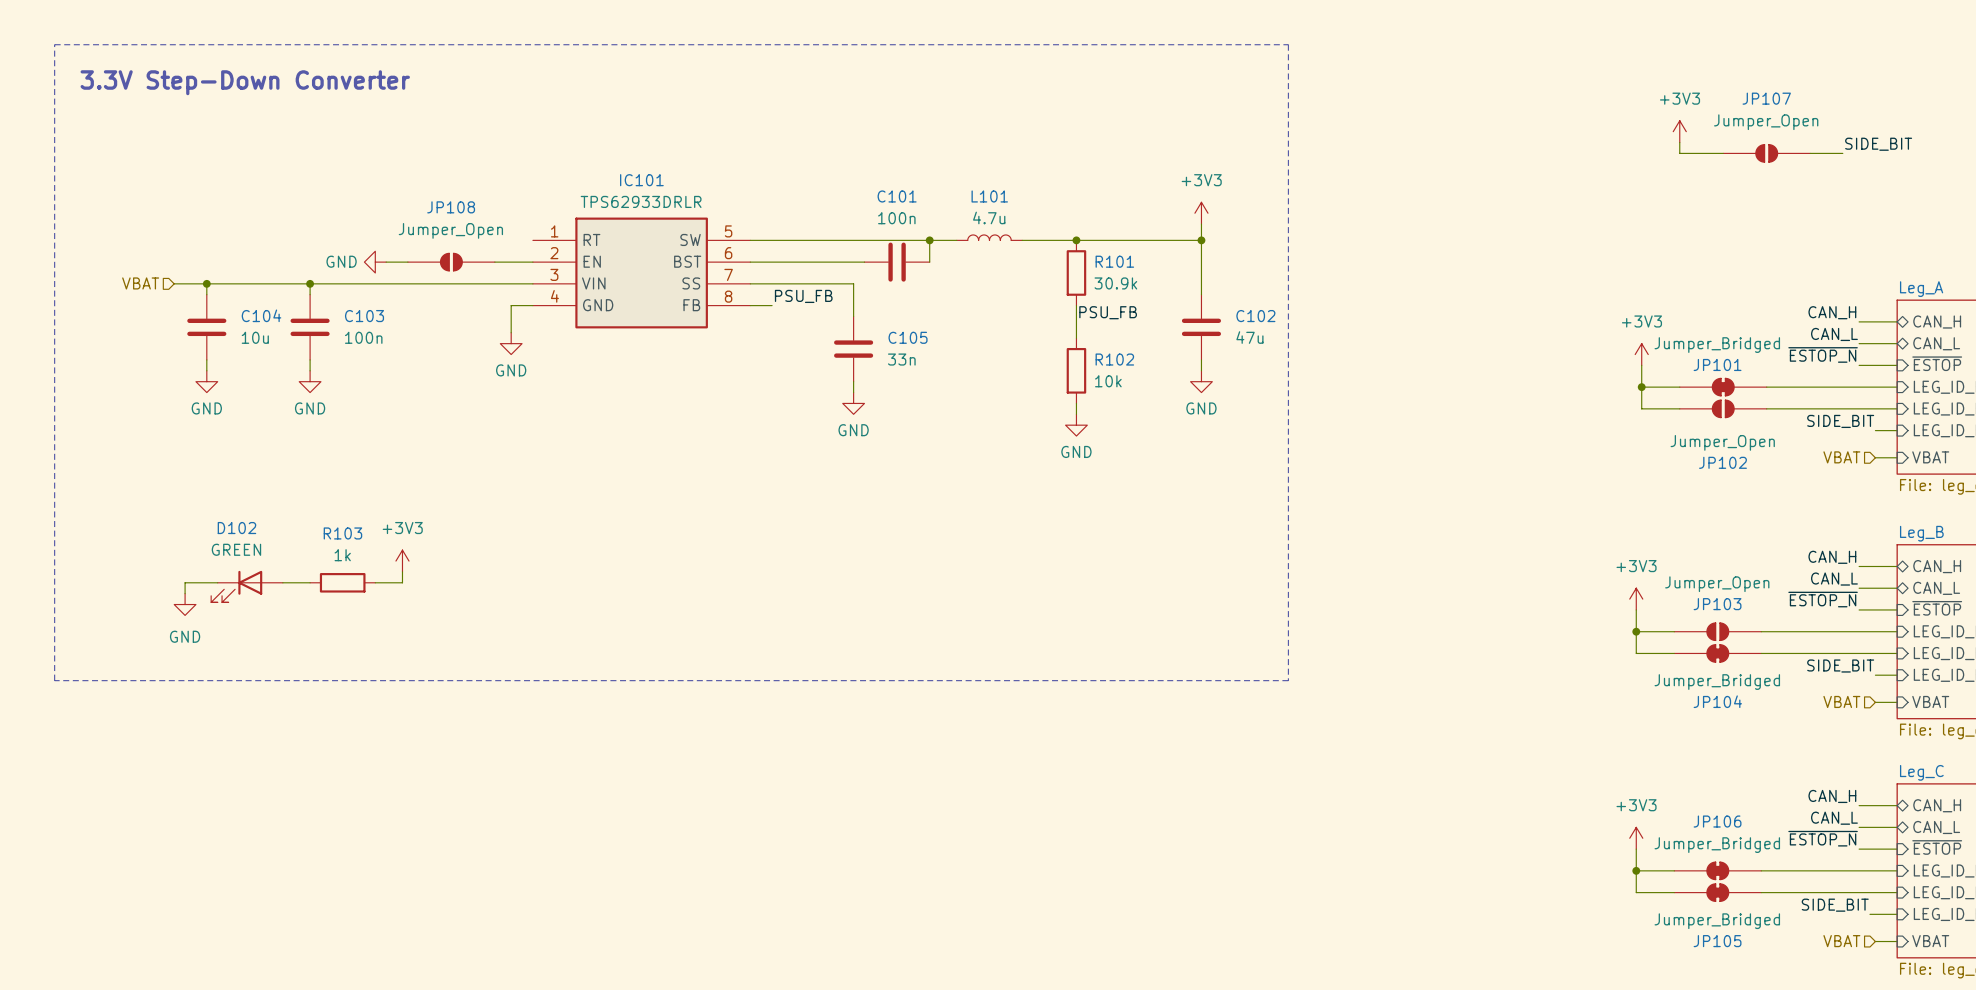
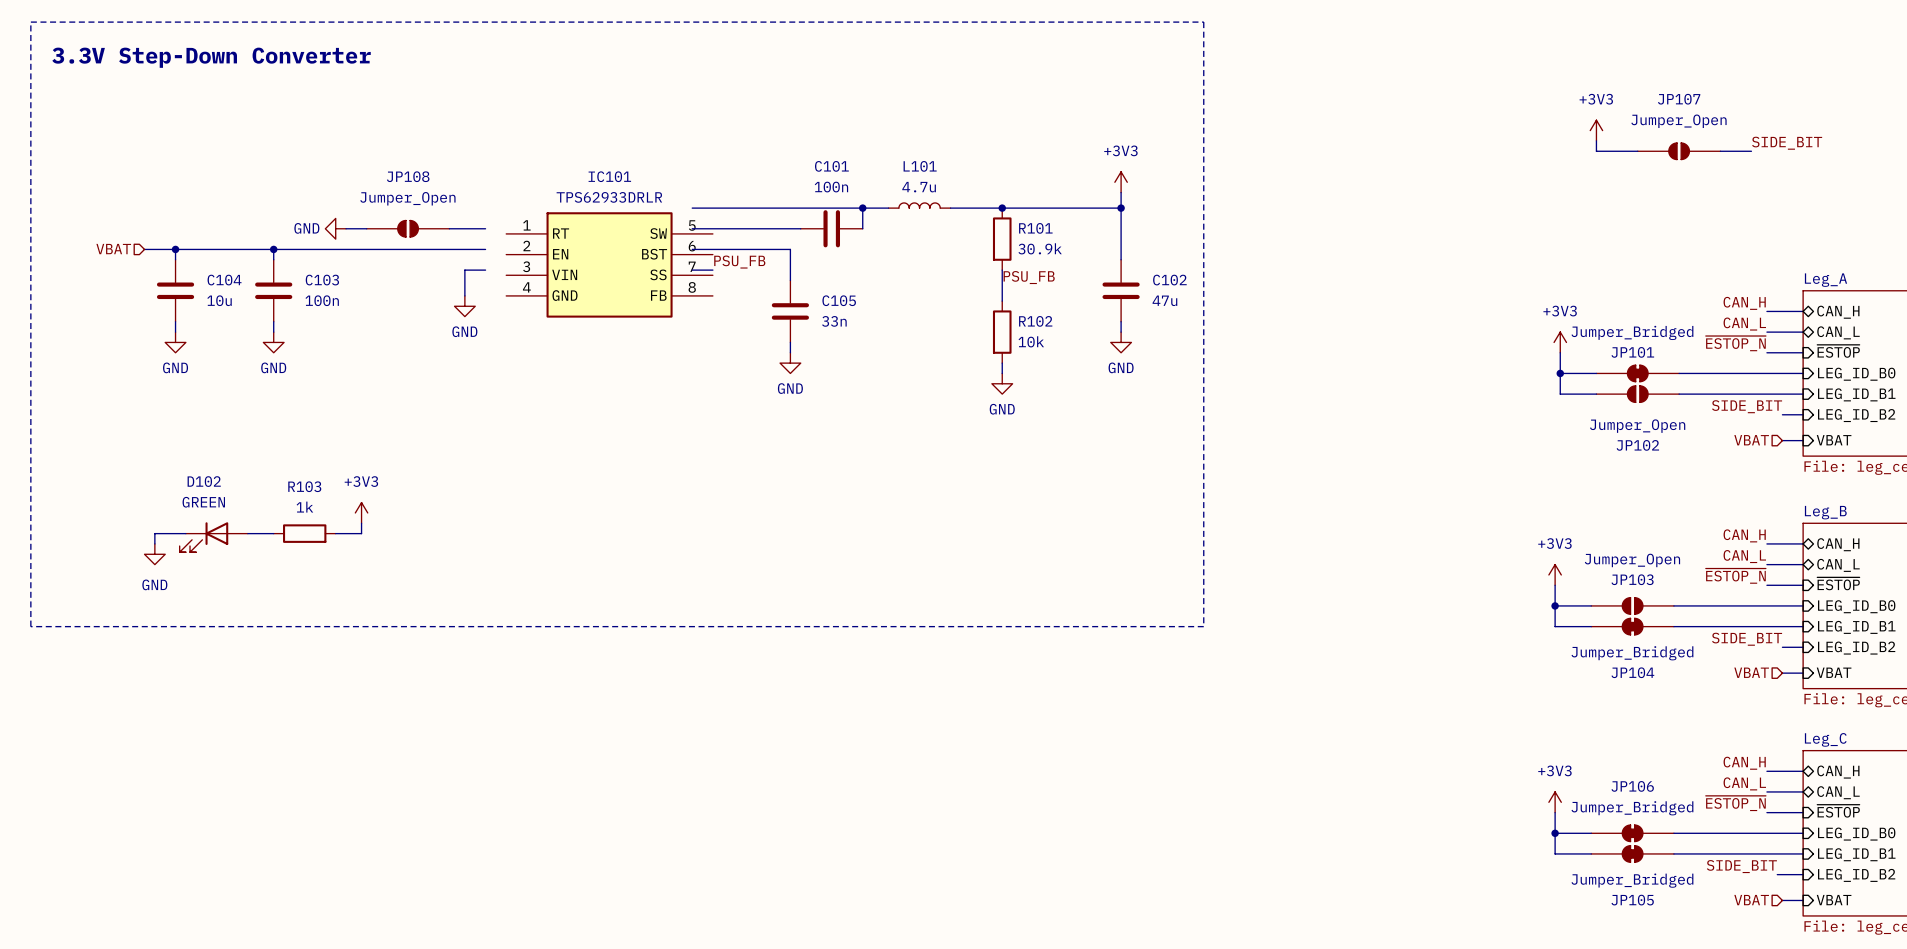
line: (54, 44) (1288, 44) (1288, 680) (54, 680) (54, 44) -> (30, 22) (1203, 22) (1203, 626) (30, 626) (30, 22)
text position: 3.3V Step-Down Converter (245, 82) -> 3.3V Step-Down Converter (211, 57)
power symbol position: +3V3 (1201, 213) -> +3V3 (1121, 182)
wire: (1201, 224) (1201, 294) -> (1121, 192) (1121, 259)
L101 position: (989, 237) -> (919, 205)
wire: (750, 240) (956, 240) -> (692, 208) (888, 208)
wire: (929, 240) (929, 262) -> (862, 208) (862, 228)
junction position: (929, 240) -> (862, 208)
wire: (1022, 240) (1201, 240) -> (950, 208) (1121, 208)
junction position: (1076, 240) -> (1002, 208)
junction position: (1201, 240) -> (1121, 208)
power symbol position: GND (375, 262) -> GND (335, 228)
wire: (386, 262) (407, 262) -> (346, 228) (366, 228)
JP108 position: (451, 262) -> (408, 228)
wire: (494, 262) (532, 262) -> (449, 228) (485, 228)
wire: (750, 262) (864, 262) -> (692, 228) (800, 228)
C101 position: (897, 262) -> (831, 228)
R101 position: (1076, 272) -> (1002, 239)
hierarchical label position: VBAT (140, 283) -> VBAT (113, 249)
wire: (174, 283) (532, 283) -> (144, 249) (485, 249)
wire: (206, 283) (206, 294) -> (175, 249) (175, 259)
junction position: (206, 283) -> (175, 249)
wire: (310, 283) (310, 294) -> (273, 249) (273, 259)
junction position: (310, 283) -> (273, 249)
wire: (750, 283) (853, 283) (853, 316) -> (692, 249) (790, 249) (790, 280)
label position: PSU_FB (803, 296) -> PSU_FB (739, 262)
wire: (532, 305) (511, 305) (511, 332) -> (485, 270) (464, 270) (464, 295)
wire: (750, 305) (772, 305) -> (692, 270) (712, 270)
wire: (1076, 305) (1076, 338) -> (1002, 270) (1002, 301)
label position: PSU_FB (1108, 312) -> PSU_FB (1029, 277)
C104 position: (206, 327) -> (175, 290)
C103 position: (310, 327) -> (273, 290)
C102 position: (1201, 327) -> (1121, 290)
power symbol position: GND (511, 343) -> GND (464, 306)
C105 position: (853, 349) -> (790, 311)
wire: (206, 359) (206, 370) -> (175, 321) (175, 332)
wire: (310, 359) (310, 370) -> (273, 321) (273, 332)
wire: (1201, 359) (1201, 370) -> (1121, 321) (1121, 332)
R102 position: (1076, 370) -> (1002, 332)
power symbol position: GND (206, 381) -> GND (175, 342)
power symbol position: GND (310, 381) -> GND (273, 342)
wire: (853, 381) (853, 392) -> (790, 342) (790, 352)
power symbol position: GND (1201, 381) -> GND (1121, 342)
power symbol position: GND (853, 403) -> GND (790, 363)
wire: (1076, 403) (1076, 414) -> (1002, 363) (1002, 373)
power symbol position: GND (1076, 425) -> GND (1002, 383)
power symbol position: +3V3 (402, 561) -> +3V3 (361, 512)
wire: (402, 571) (402, 582) (375, 582) -> (361, 523) (361, 533) (335, 533)
wire: (217, 582) (185, 582) (185, 593) -> (185, 533) (154, 533) (154, 543)
wire: (282, 582) (310, 582) -> (247, 533) (273, 533)
R103 position: (342, 582) -> (304, 533)
D102 position: (247, 586) -> (213, 537)
power symbol position: GND (185, 604) -> GND (154, 554)

